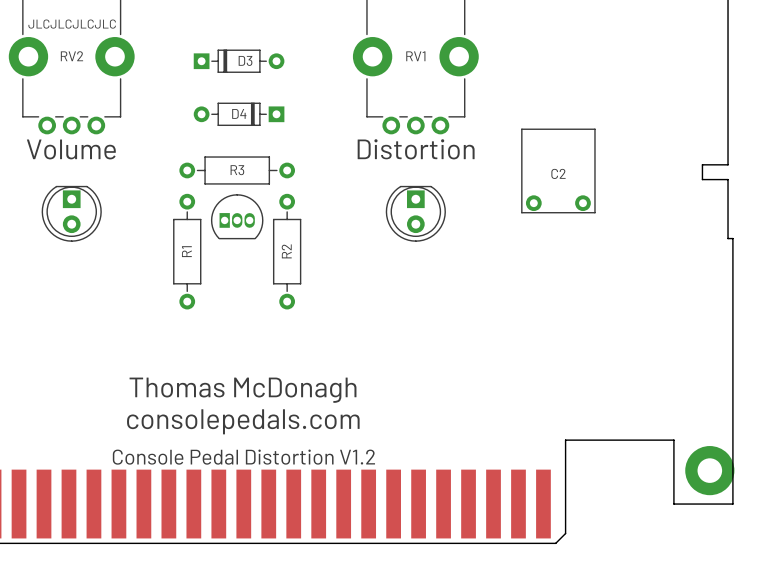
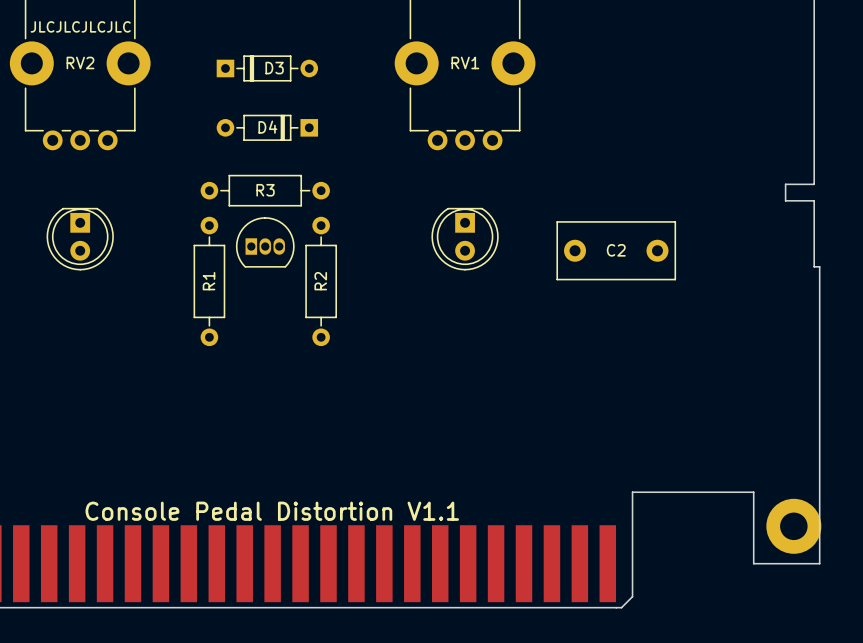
C2 footprint: [521, 128, 596, 214] -> [556, 221, 676, 281]
text: Volume (71, 149) -> none
text: Distortion (416, 149) -> none
text: Thomas McDonagh (243, 390) -> none
text: consolepedals.com (243, 421) -> none
text: Console Pedal Distortion V1.2 (243, 457) -> Console Pedal Distortion V1.1 (272, 511)

